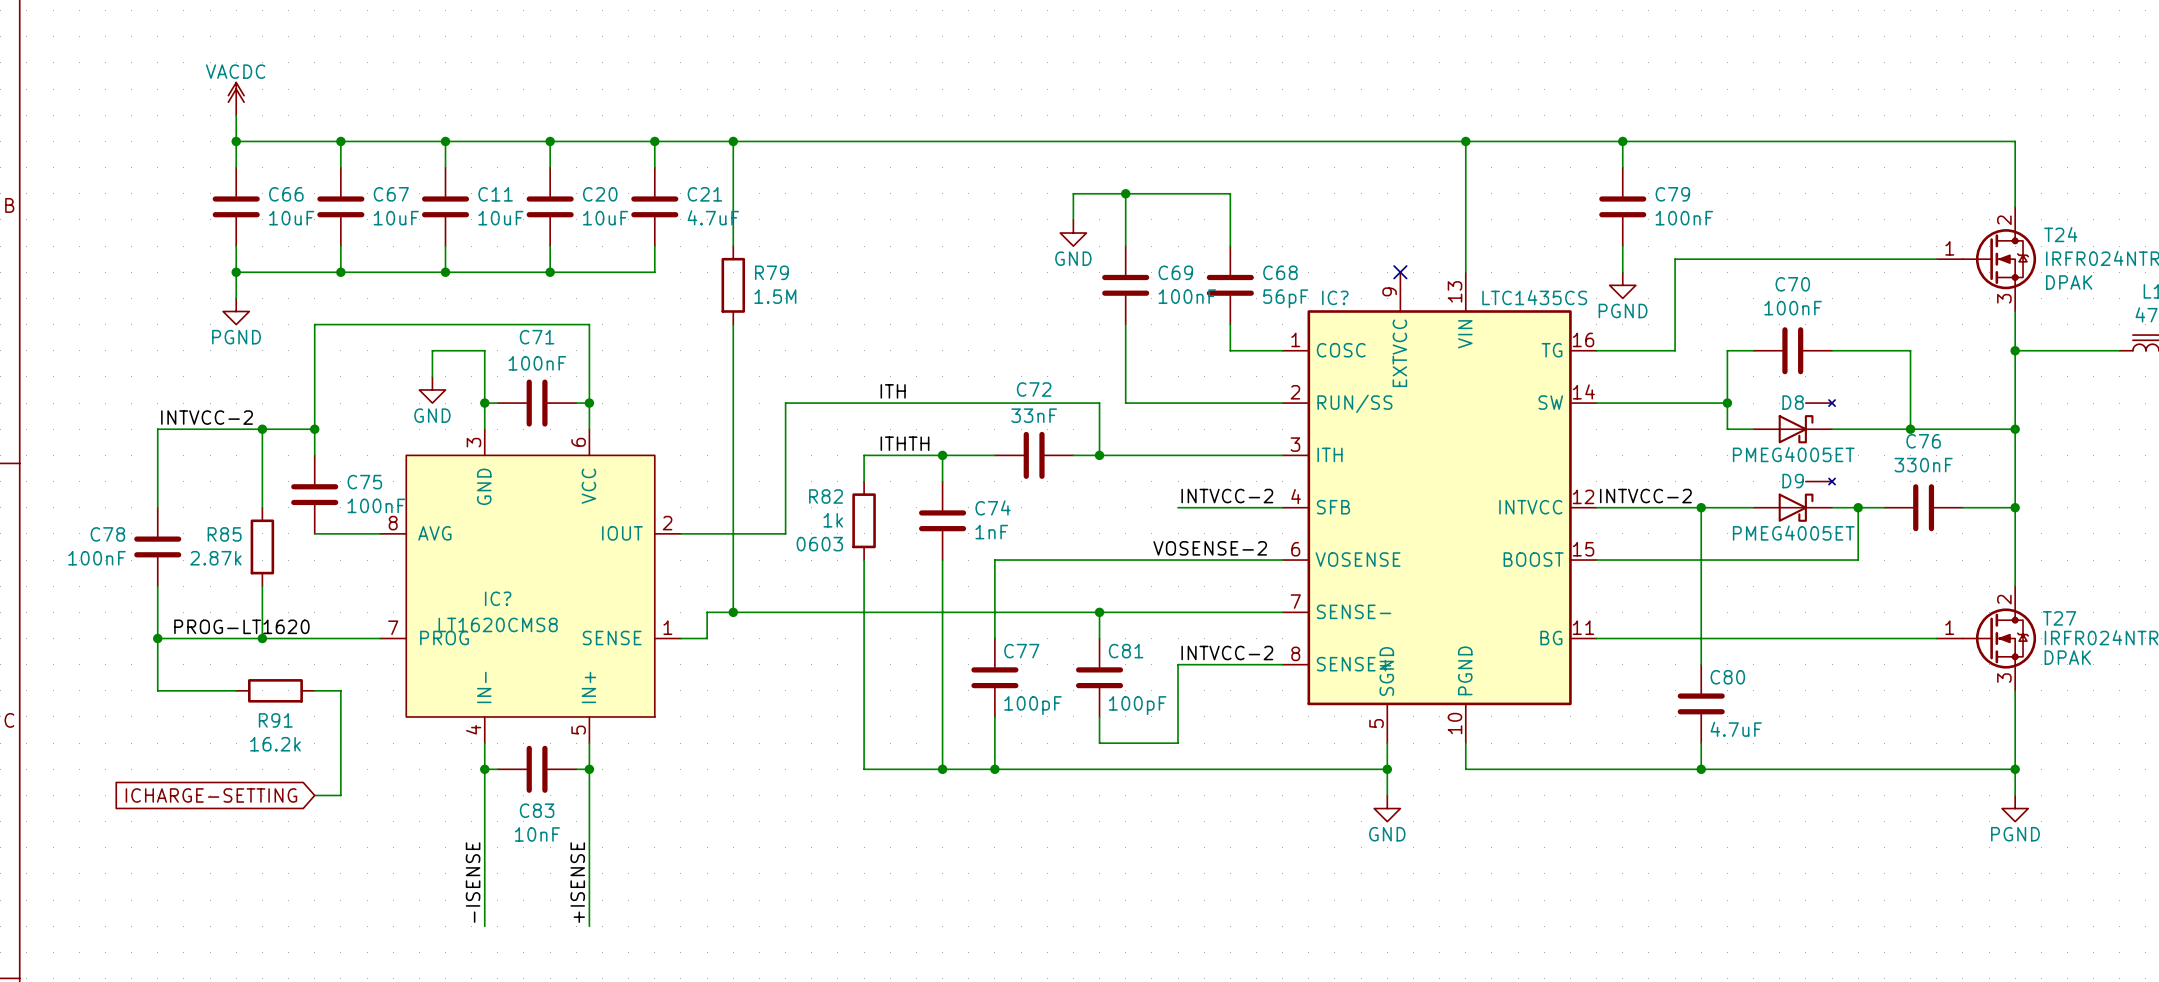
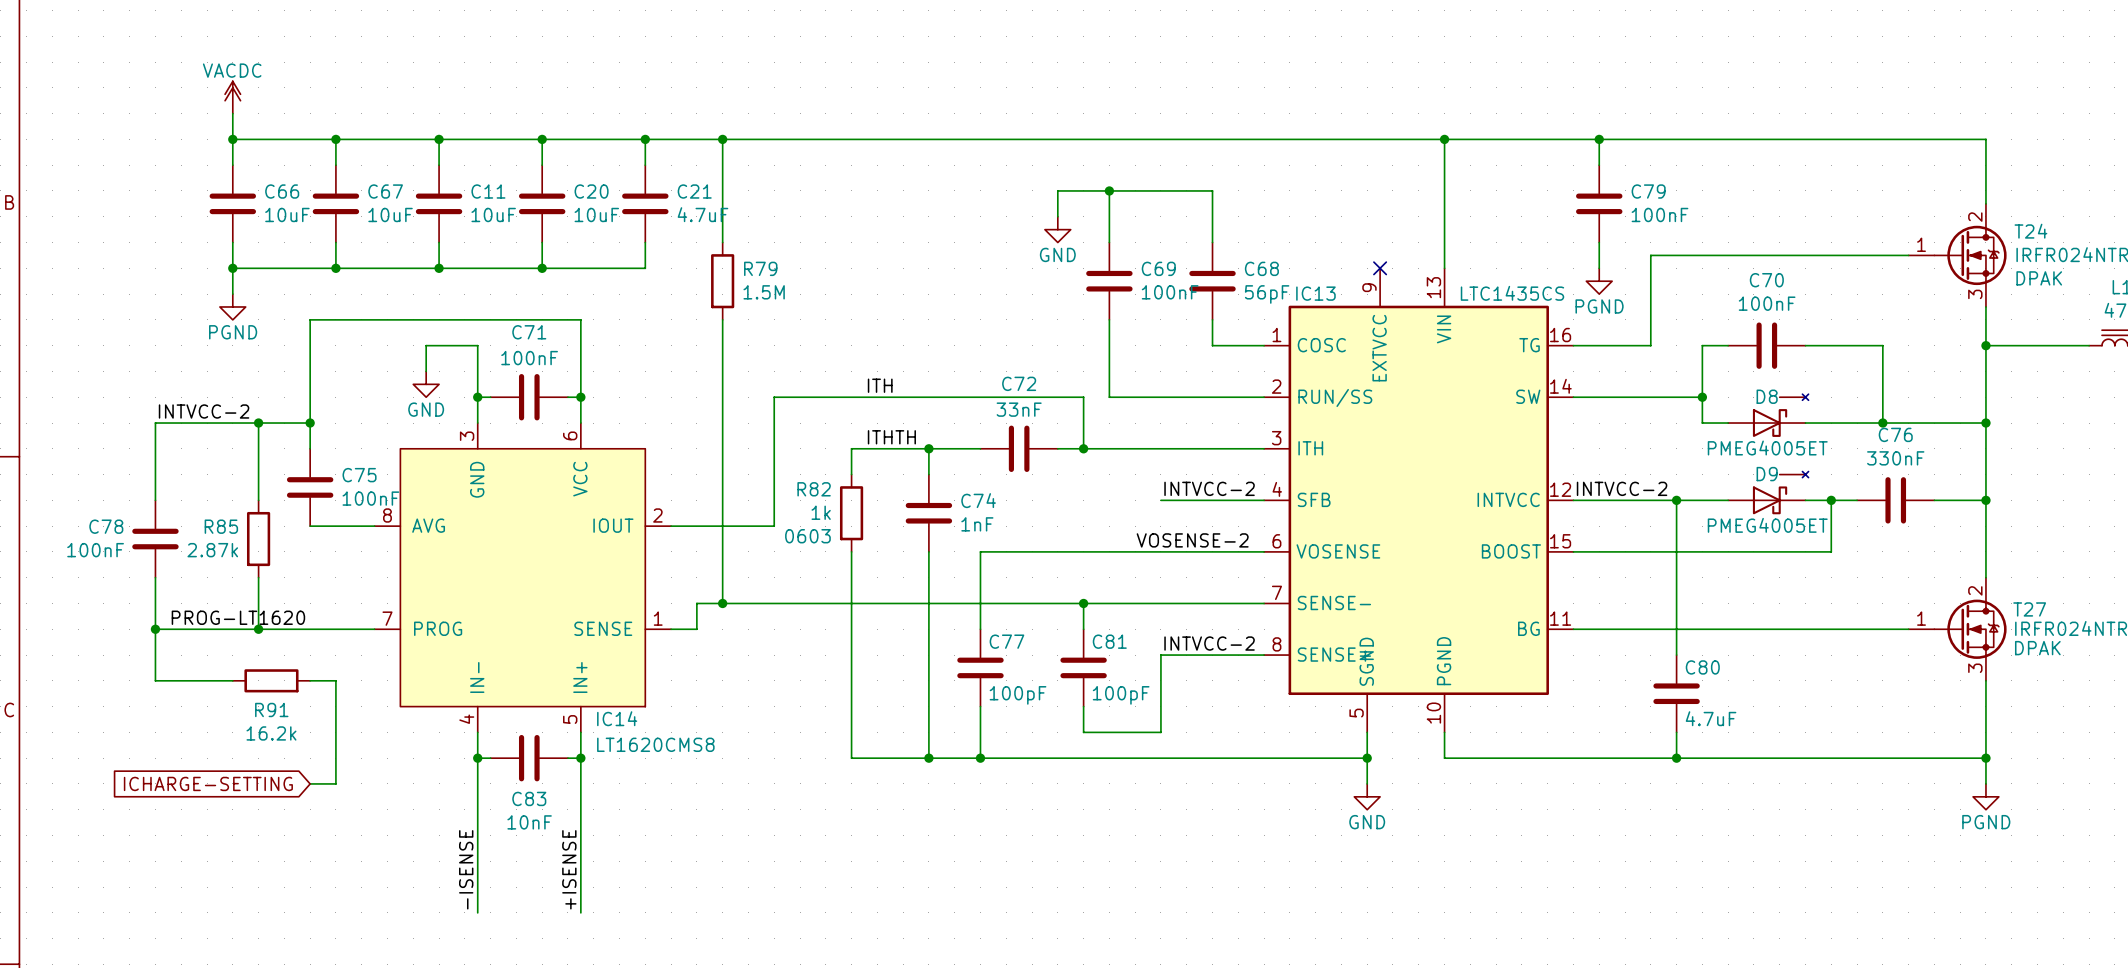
IC? name: IC? (1335, 297) -> IC13 (1315, 293)
IC? name: IC? (498, 598) -> IC14 (617, 718)
IC? value position: LT1620CMS8 (498, 624) -> LT1620CMS8 (655, 744)

